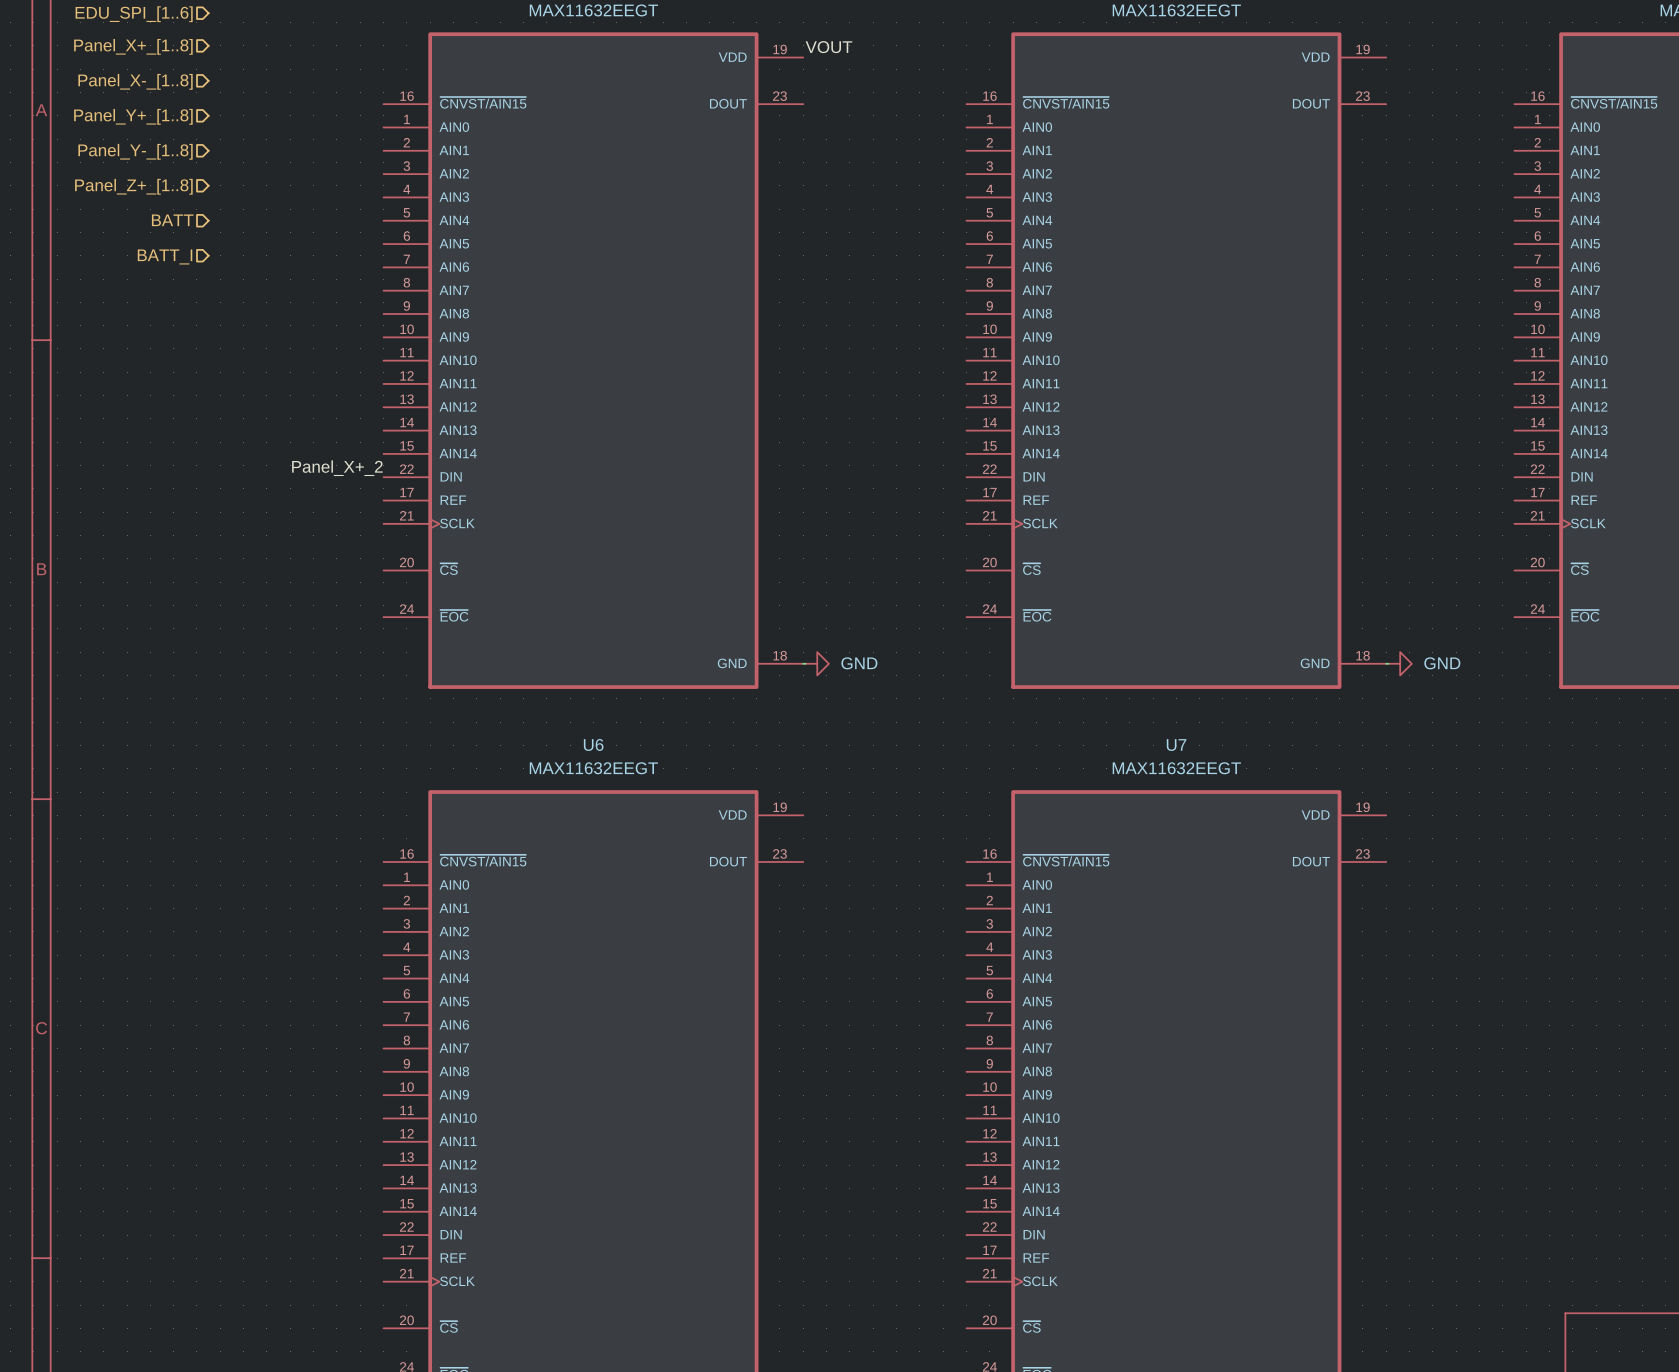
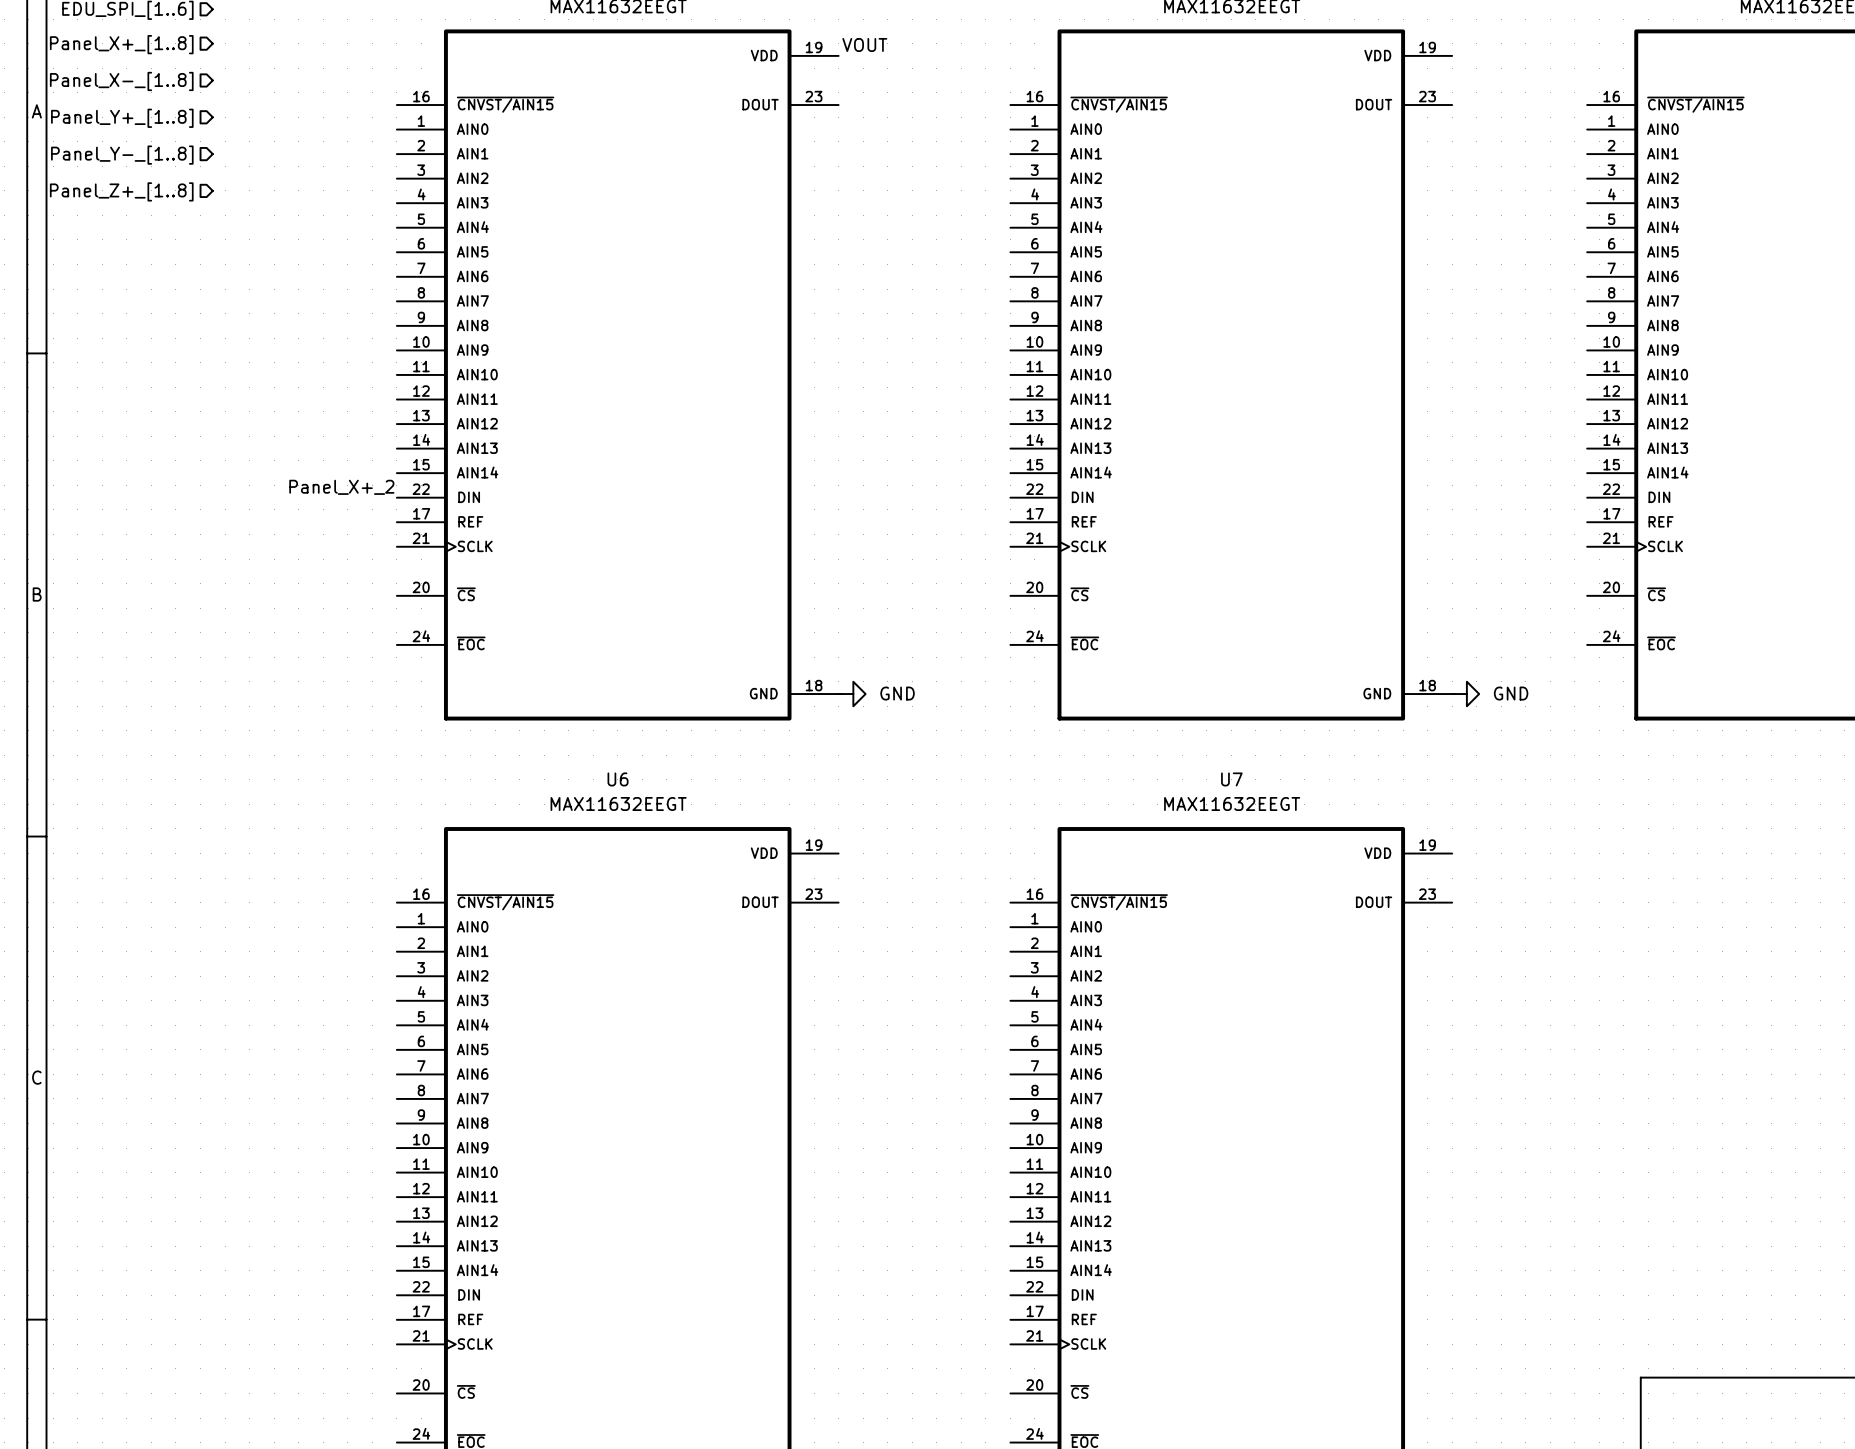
hierarchical label: BATT (172, 220) -> none
hierarchical label: BATT_I (165, 256) -> none

